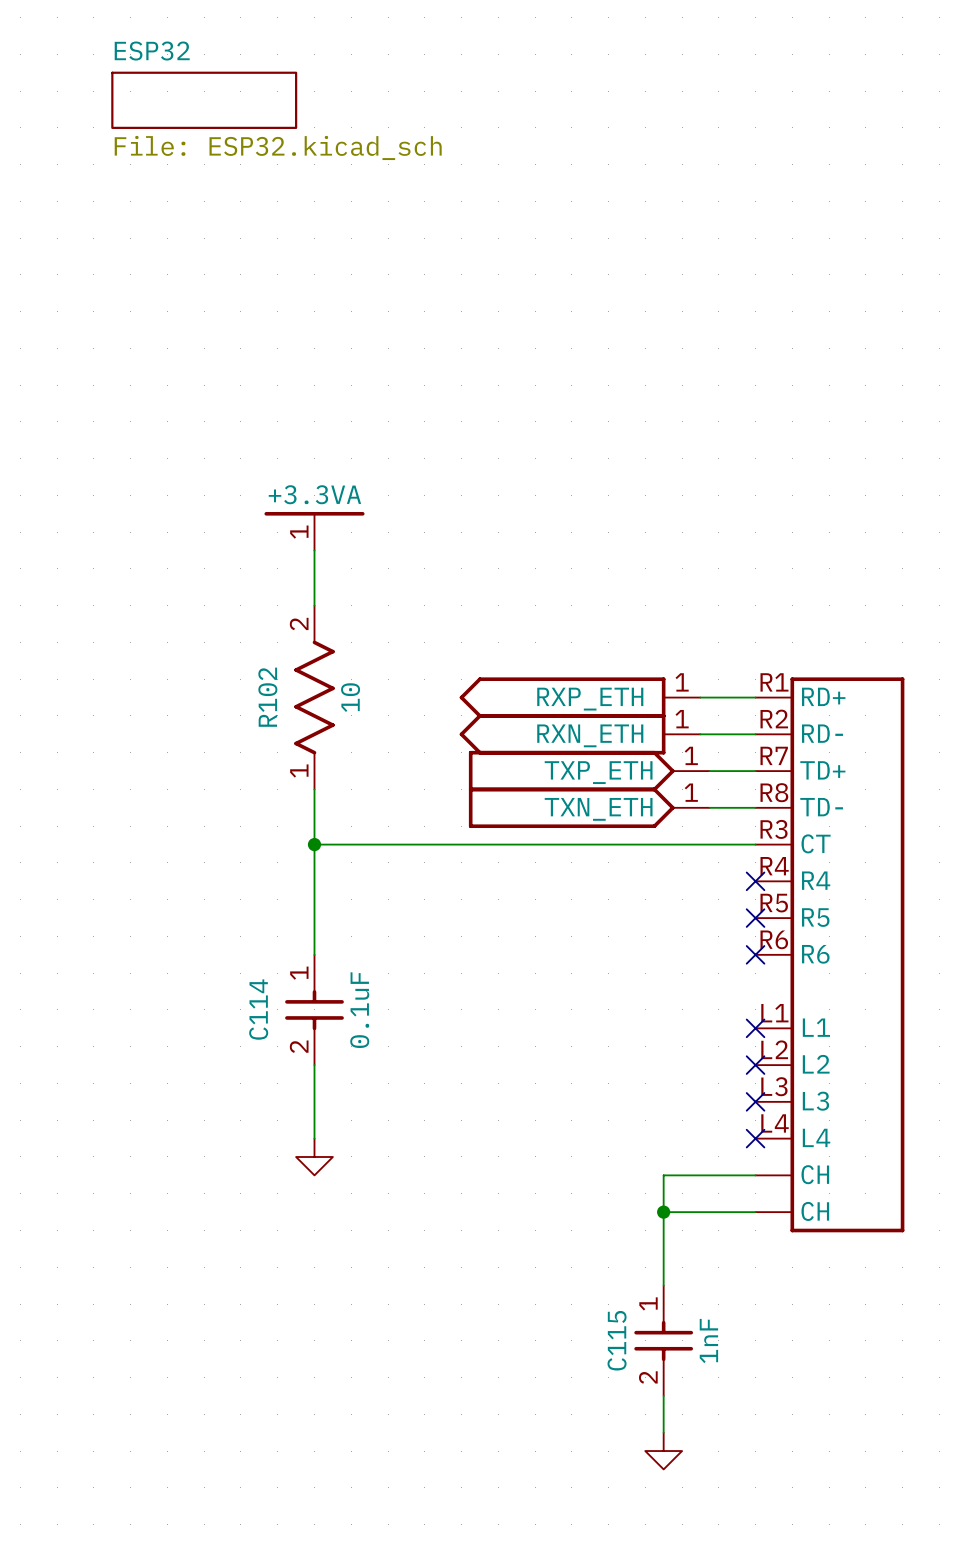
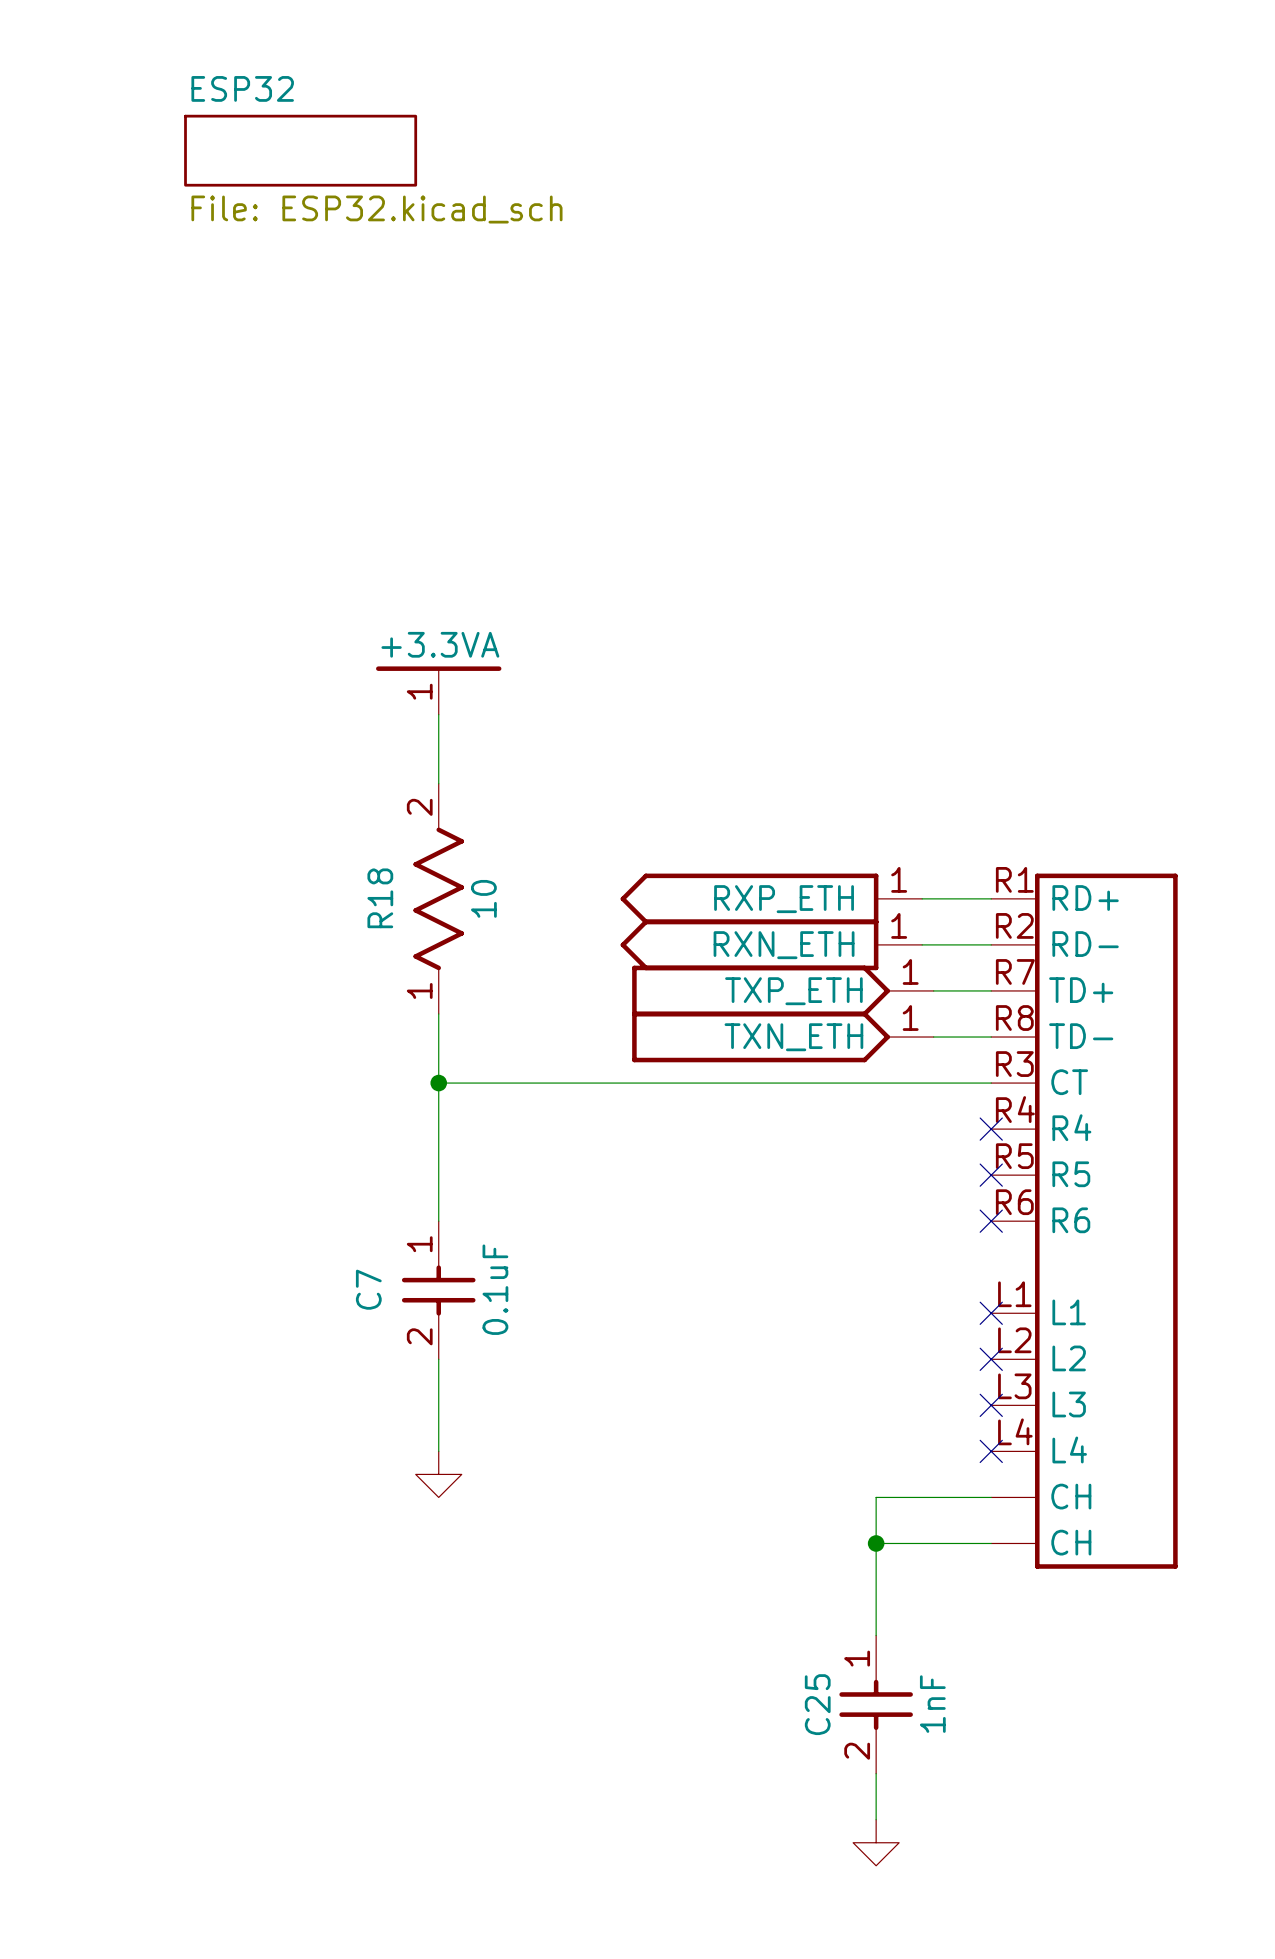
R102 name: R102 (267, 697) -> R18 (380, 898)
C114 name: C114 (258, 1009) -> C7 (368, 1289)
C115 name: C115 (617, 1340) -> C25 (817, 1704)

